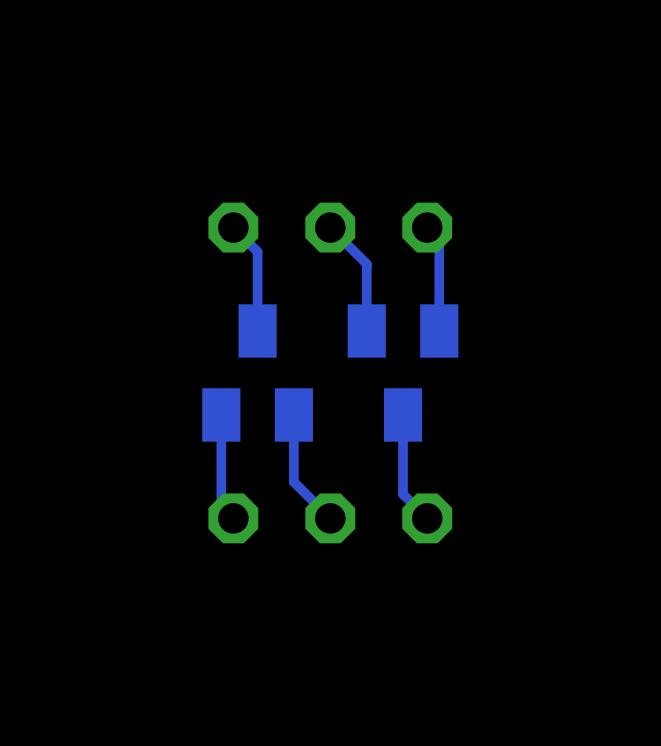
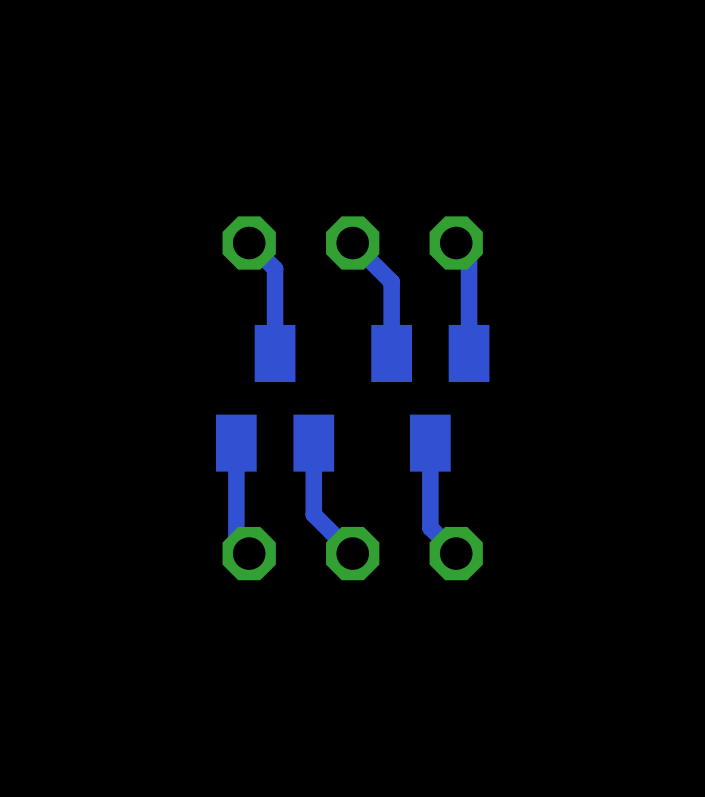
track width: thin (233, 227) (257, 251) (257, 331) -> thick (249, 243) (275, 268) (275, 353)
track width: thin (330, 227) (366, 264) (366, 331) -> thick (352, 243) (391, 281) (391, 353)
track width: thin (427, 227) (439, 239) (439, 331) -> thick (456, 243) (469, 255) (469, 353)
track width: thin (221, 414) (221, 506) (233, 518) -> thick (236, 443) (236, 540) (249, 553)
track width: thin (293, 414) (293, 481) (330, 518) -> thick (313, 443) (313, 514) (352, 553)
track width: thin (403, 414) (403, 494) (427, 518) -> thick (430, 443) (430, 527) (456, 553)

